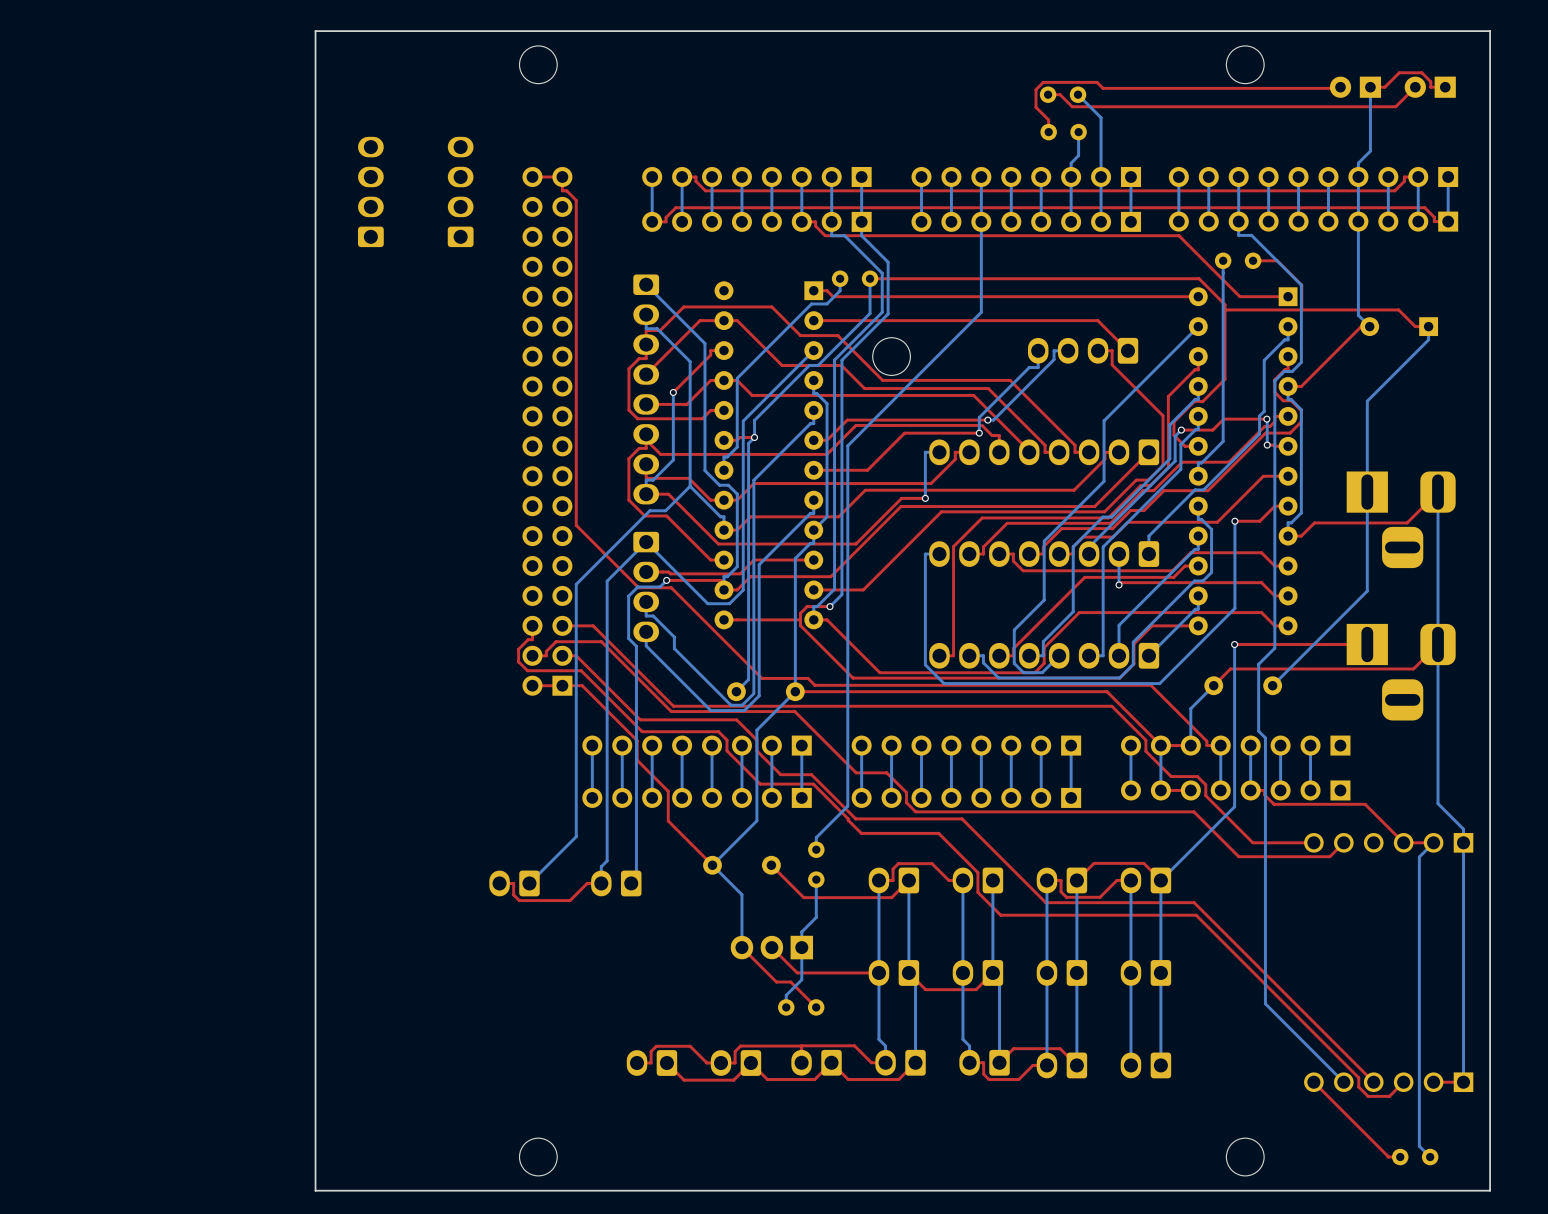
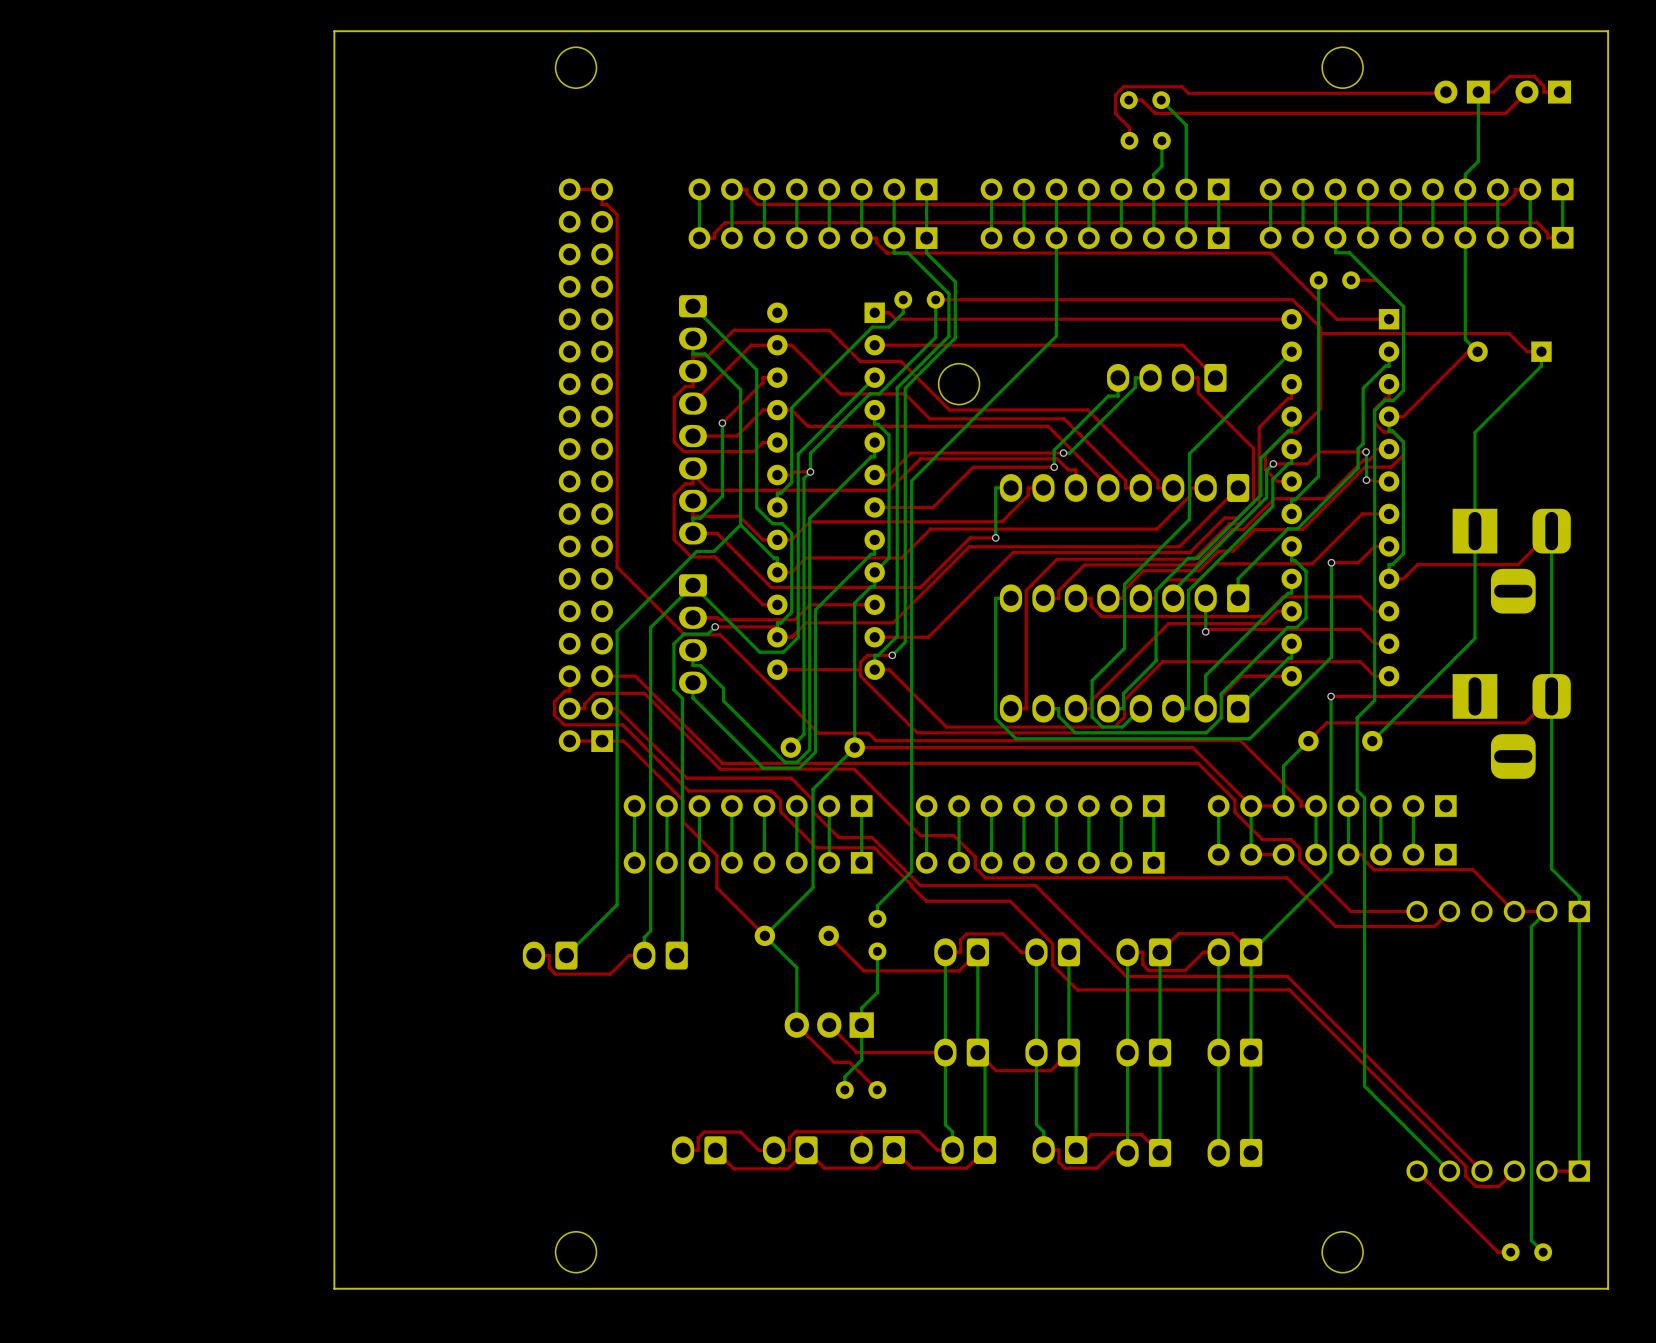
part: (370, 191) -> none
part: (460, 191) -> none

